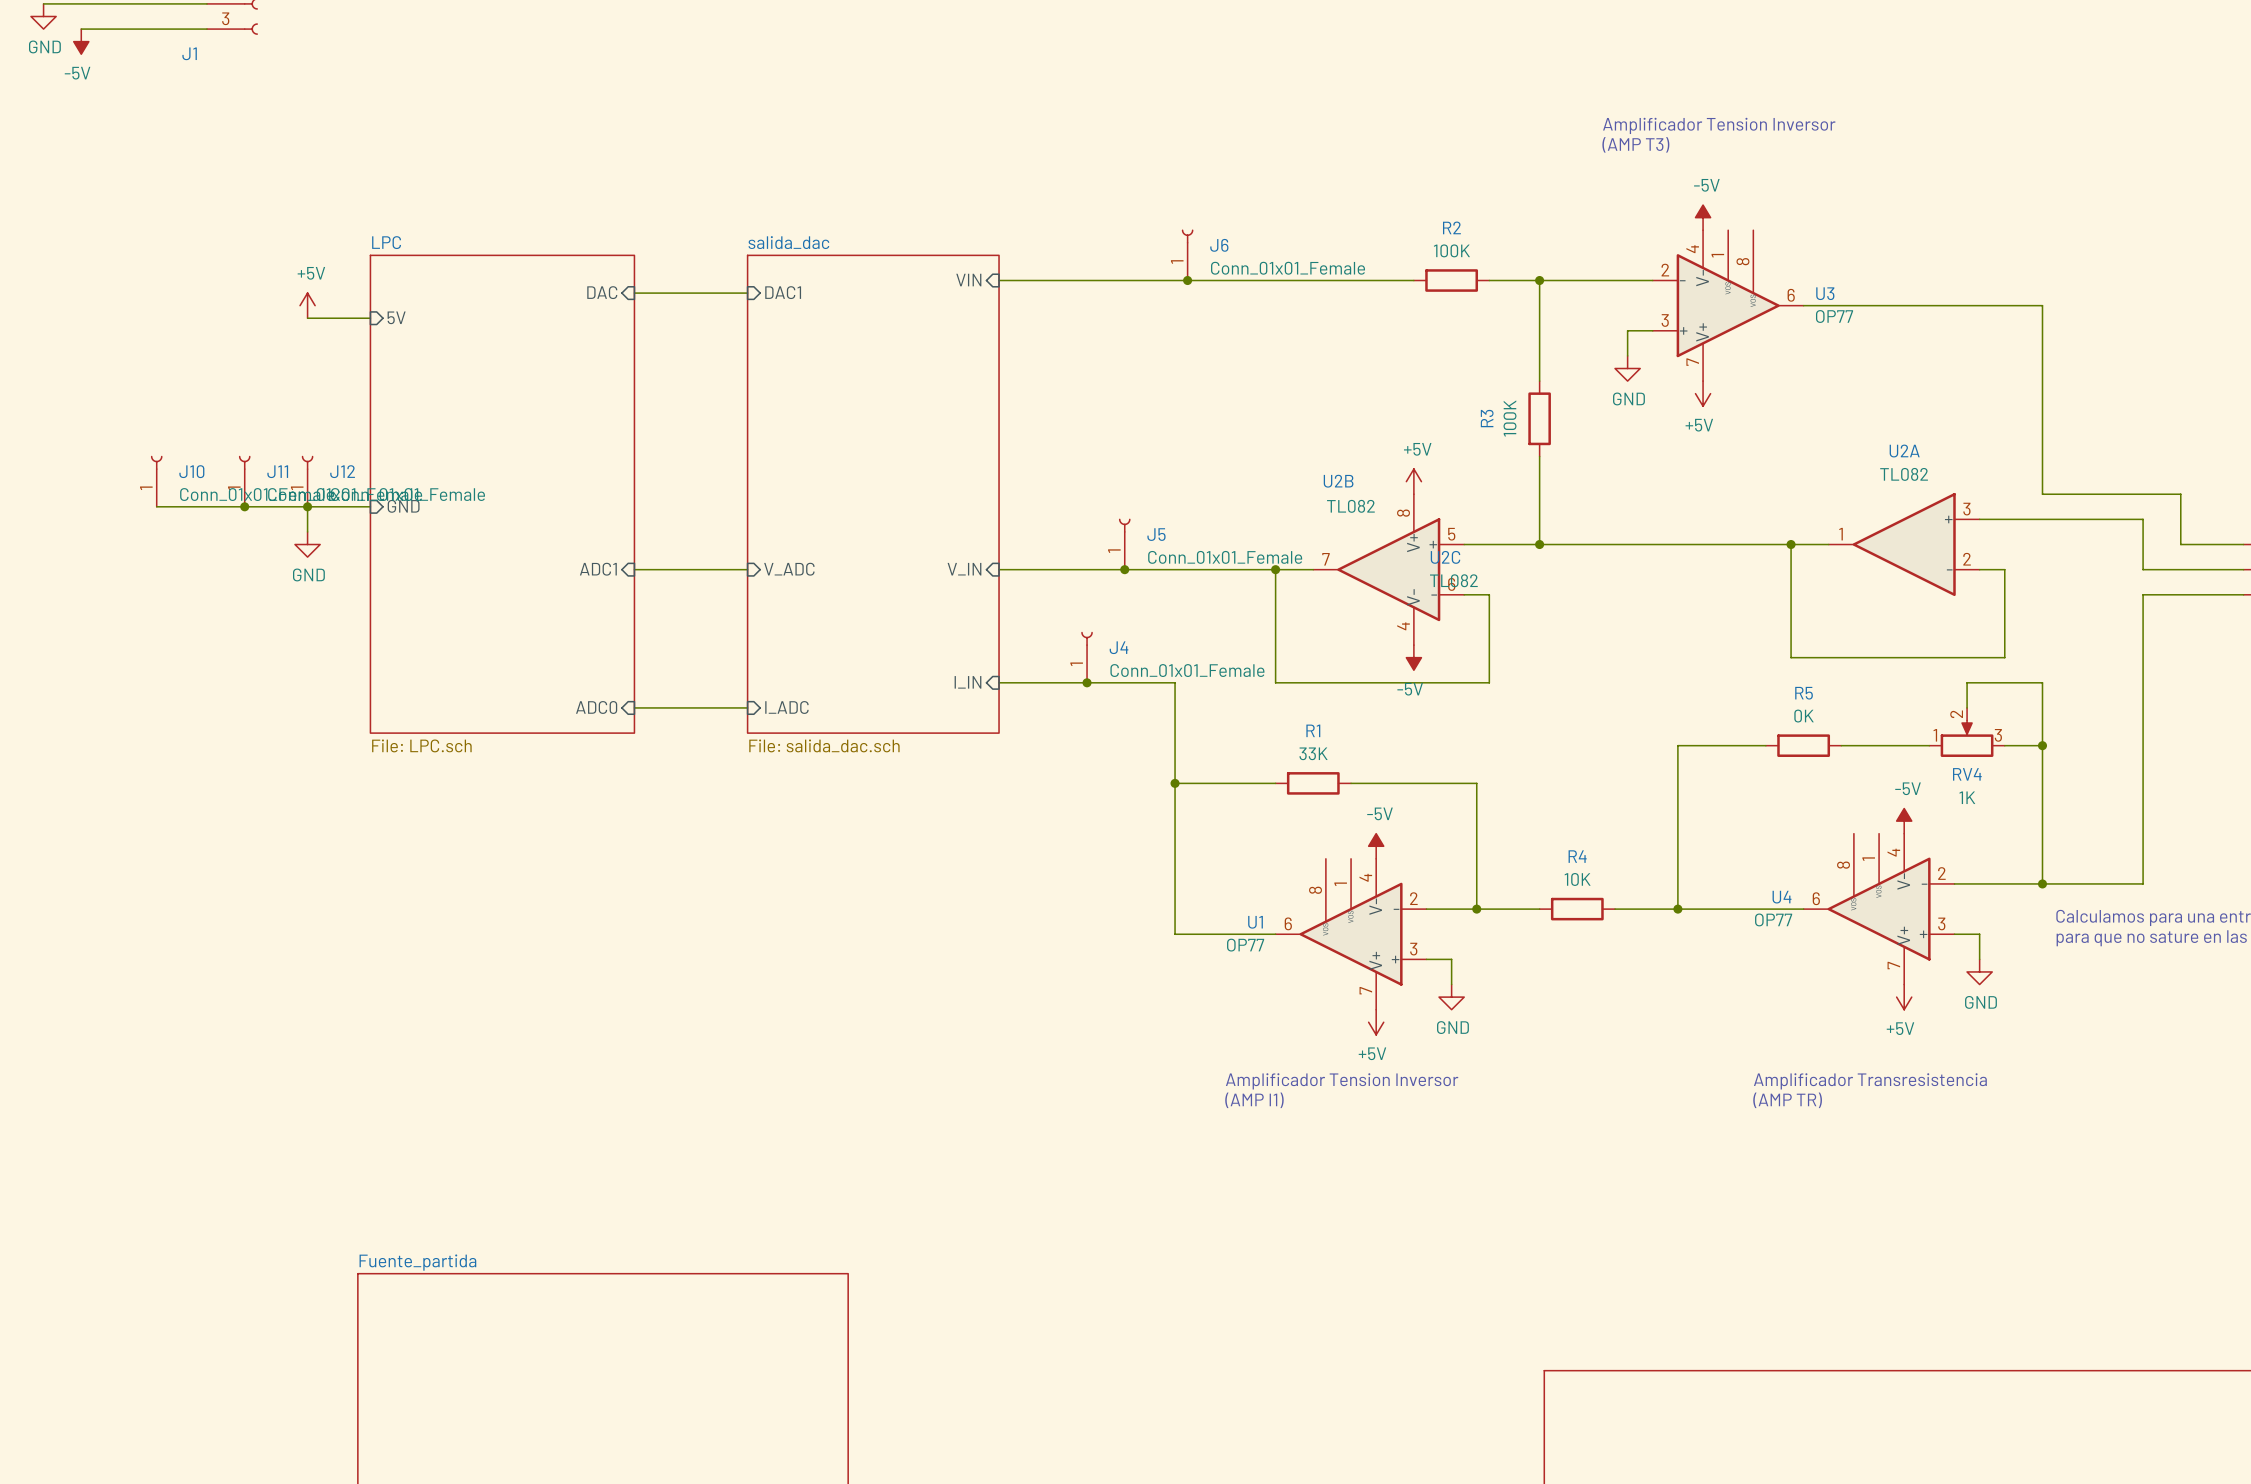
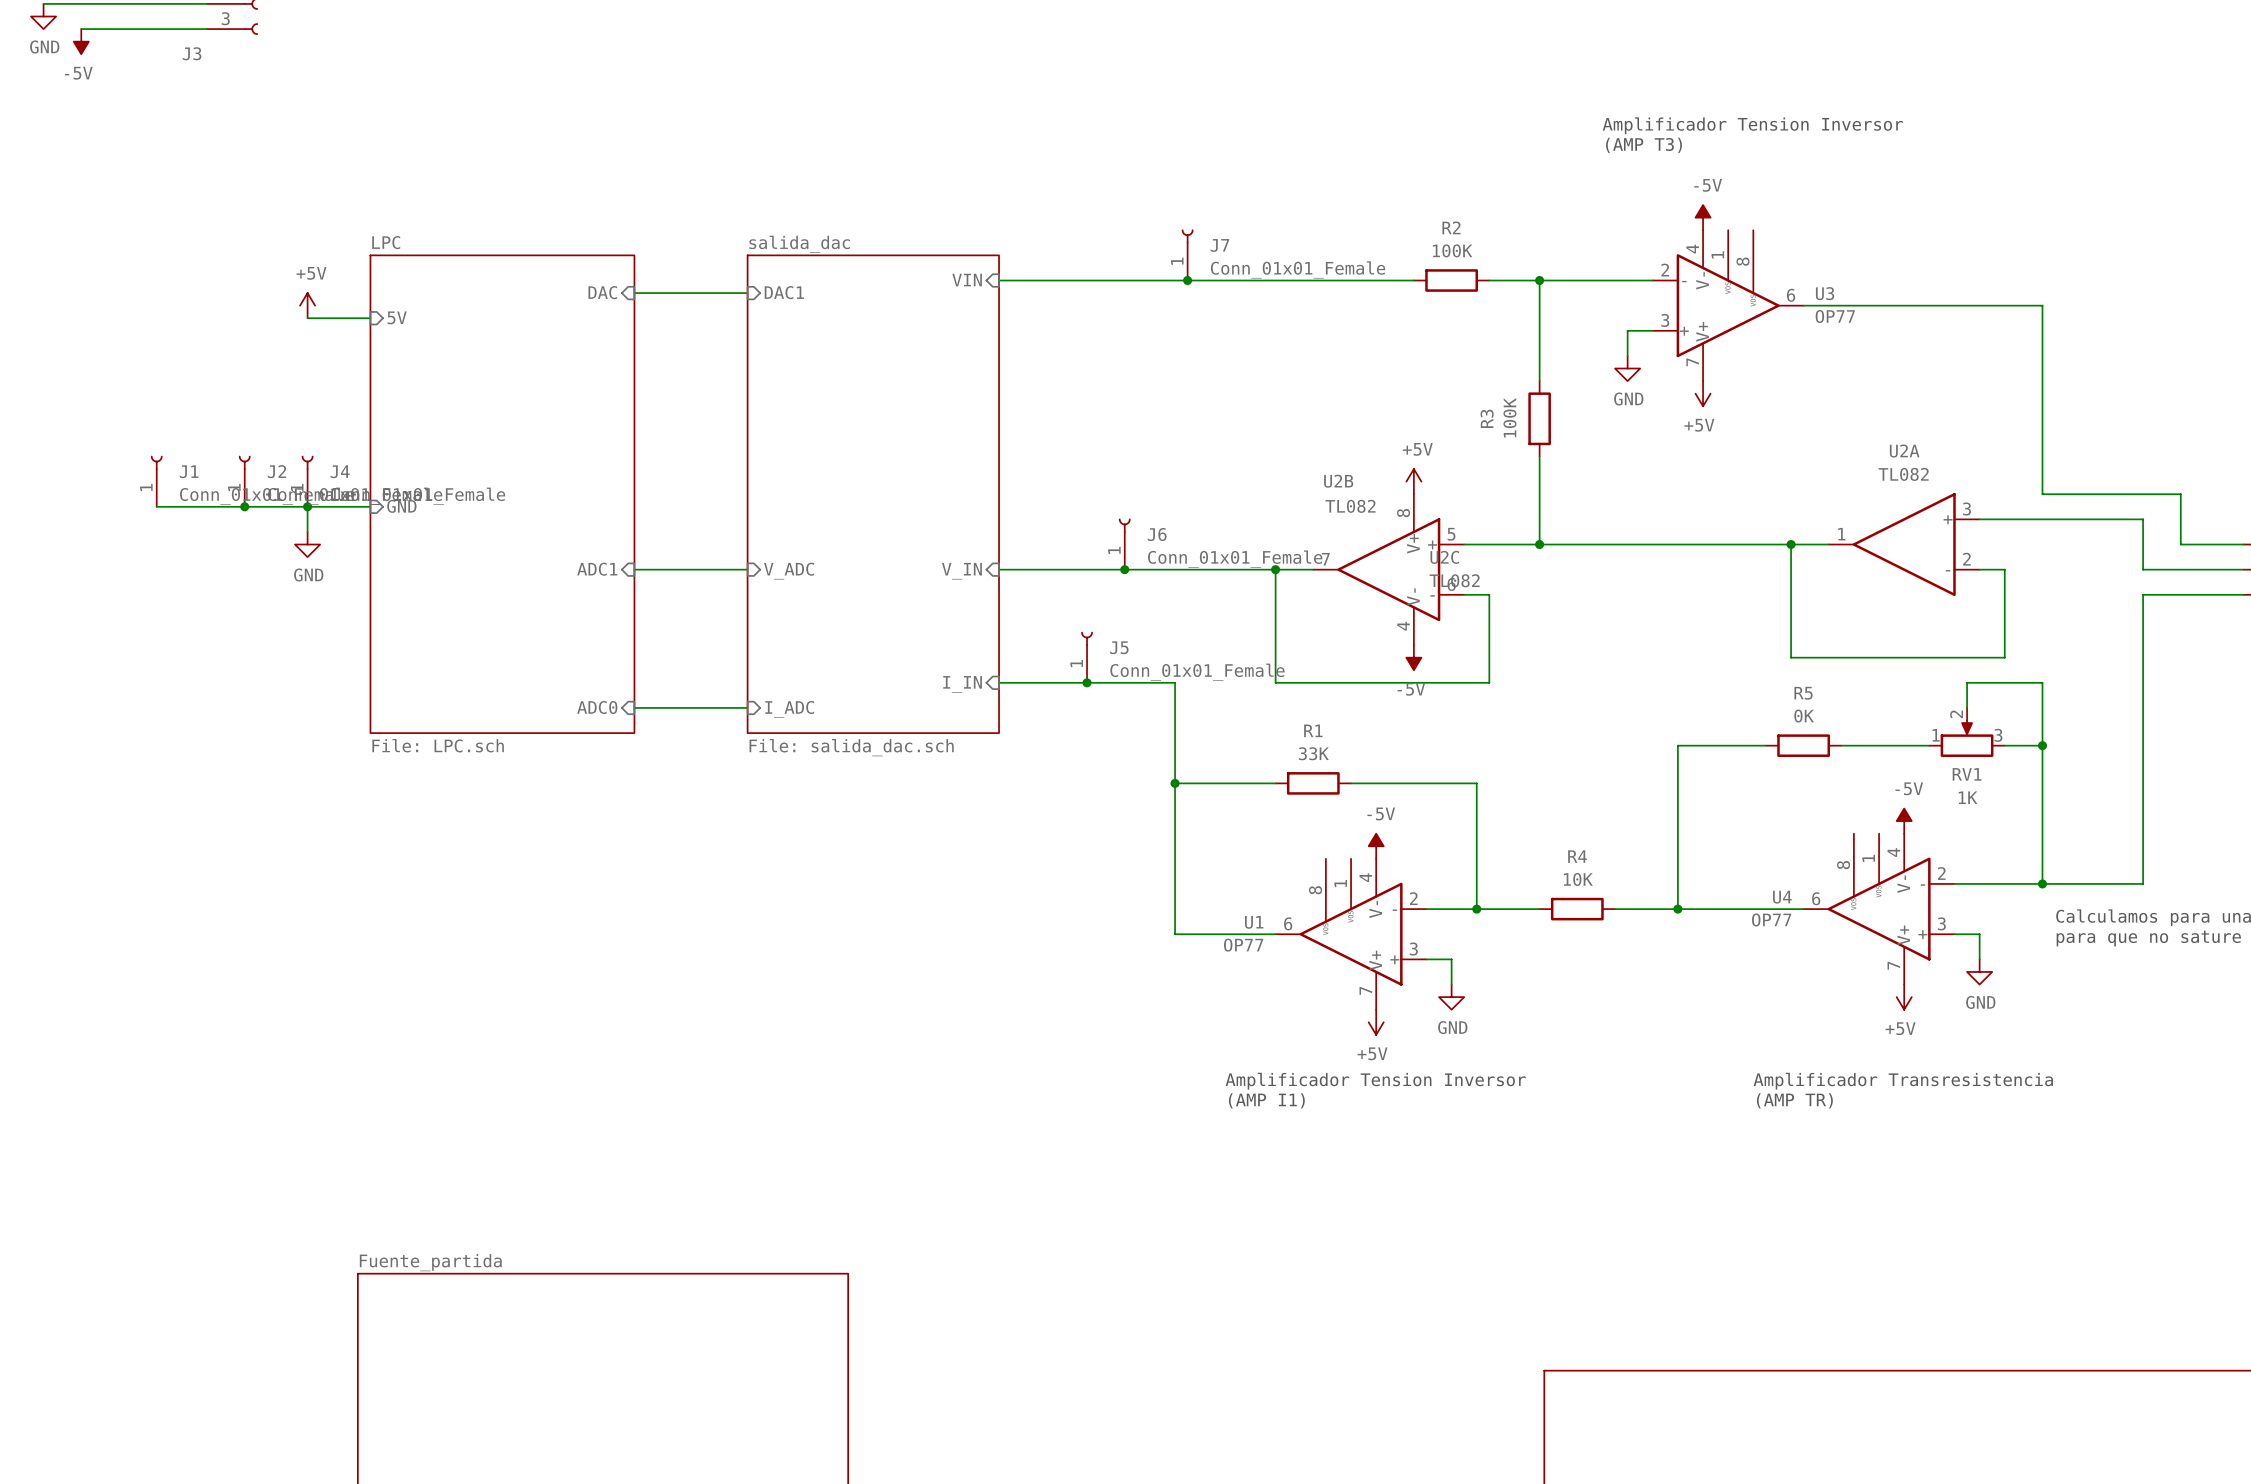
J1 name: J1 (189, 53) -> J3 (192, 53)
J6 name: J6 (1219, 245) -> J7 (1219, 245)
J10 name: J10 (191, 471) -> J1 (189, 471)
J11 name: J11 (277, 471) -> J2 (276, 471)
J12 name: J12 (342, 471) -> J4 (340, 471)
J5 name: J5 (1156, 534) -> J6 (1157, 534)
J4 name: J4 (1119, 647) -> J5 (1119, 647)
RV4 name: RV4 (1967, 774) -> RV1 (1967, 774)

